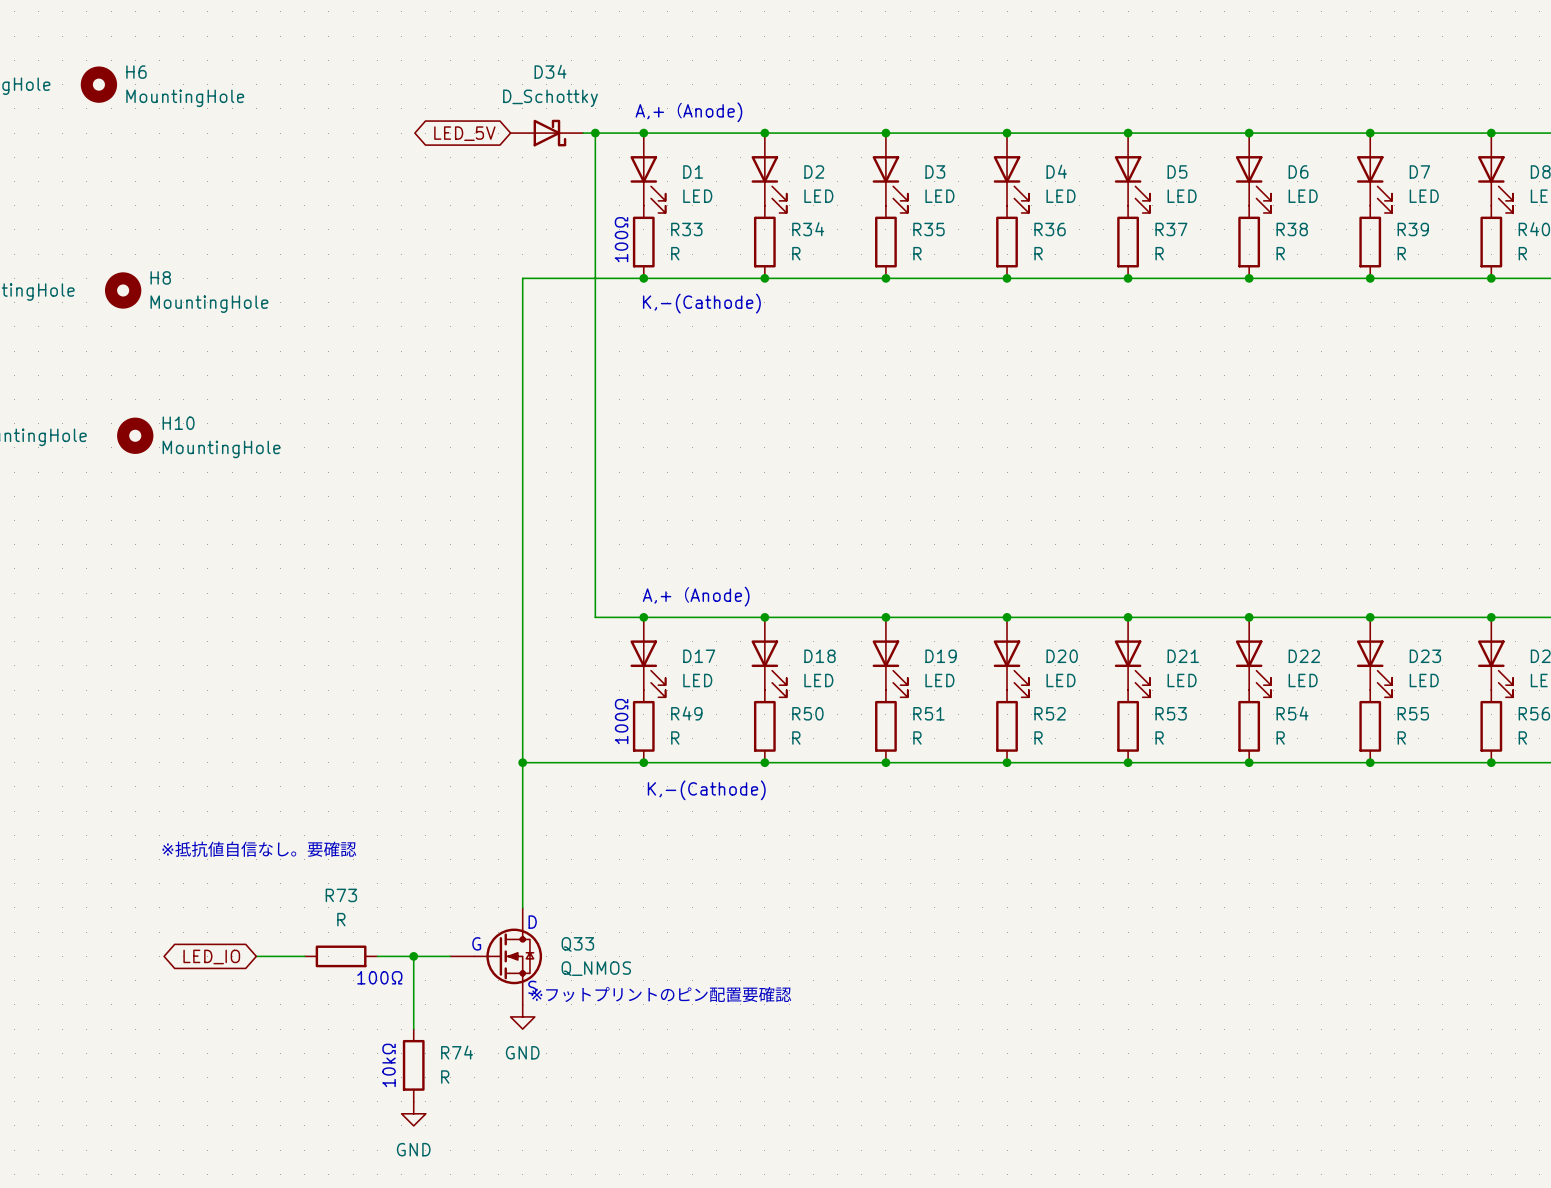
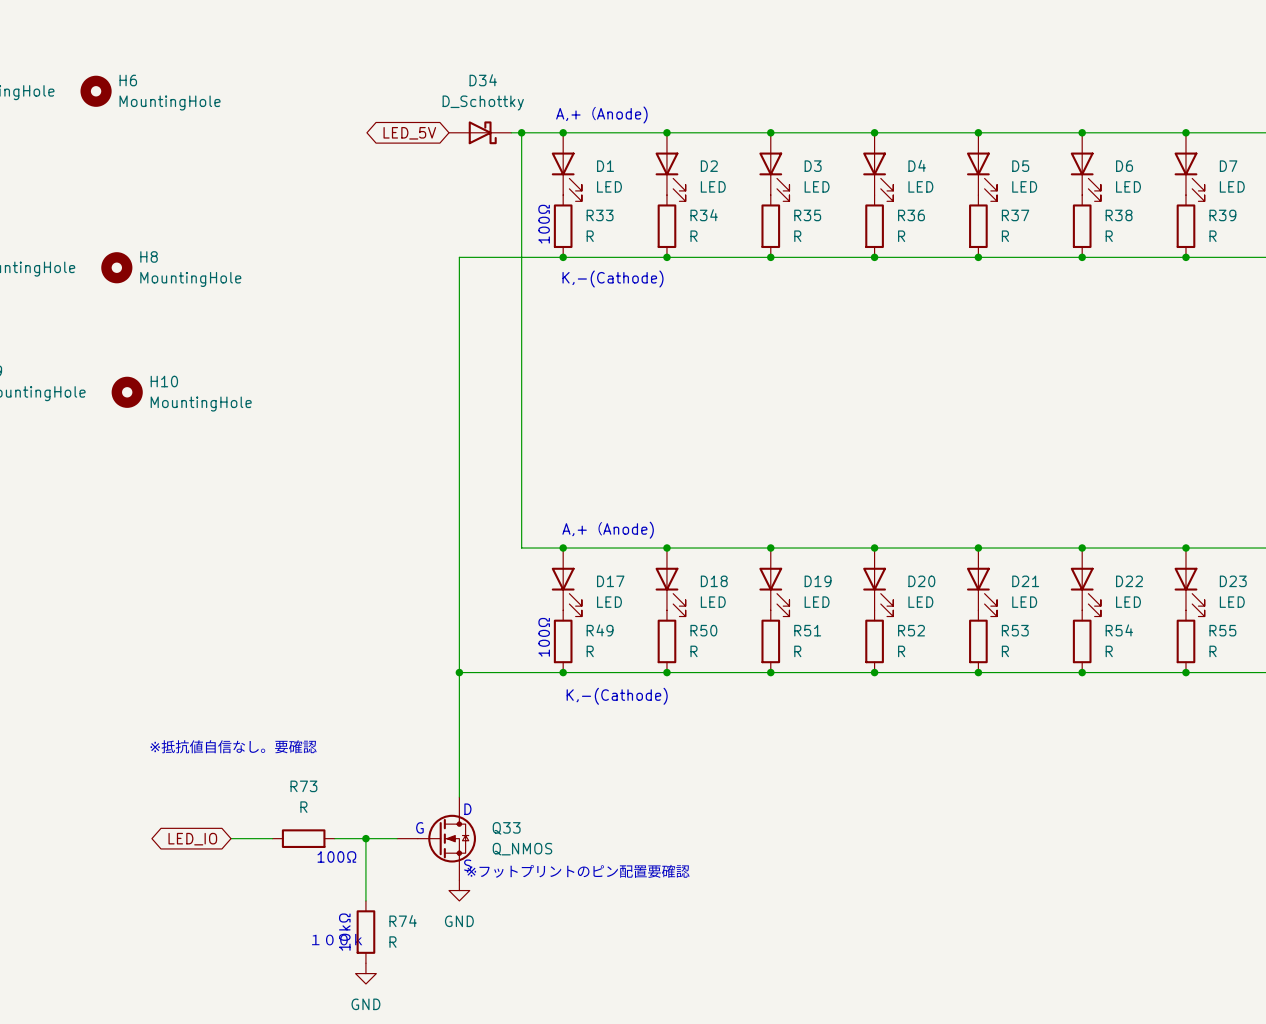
text: none -> １００ｋ (337, 939)

